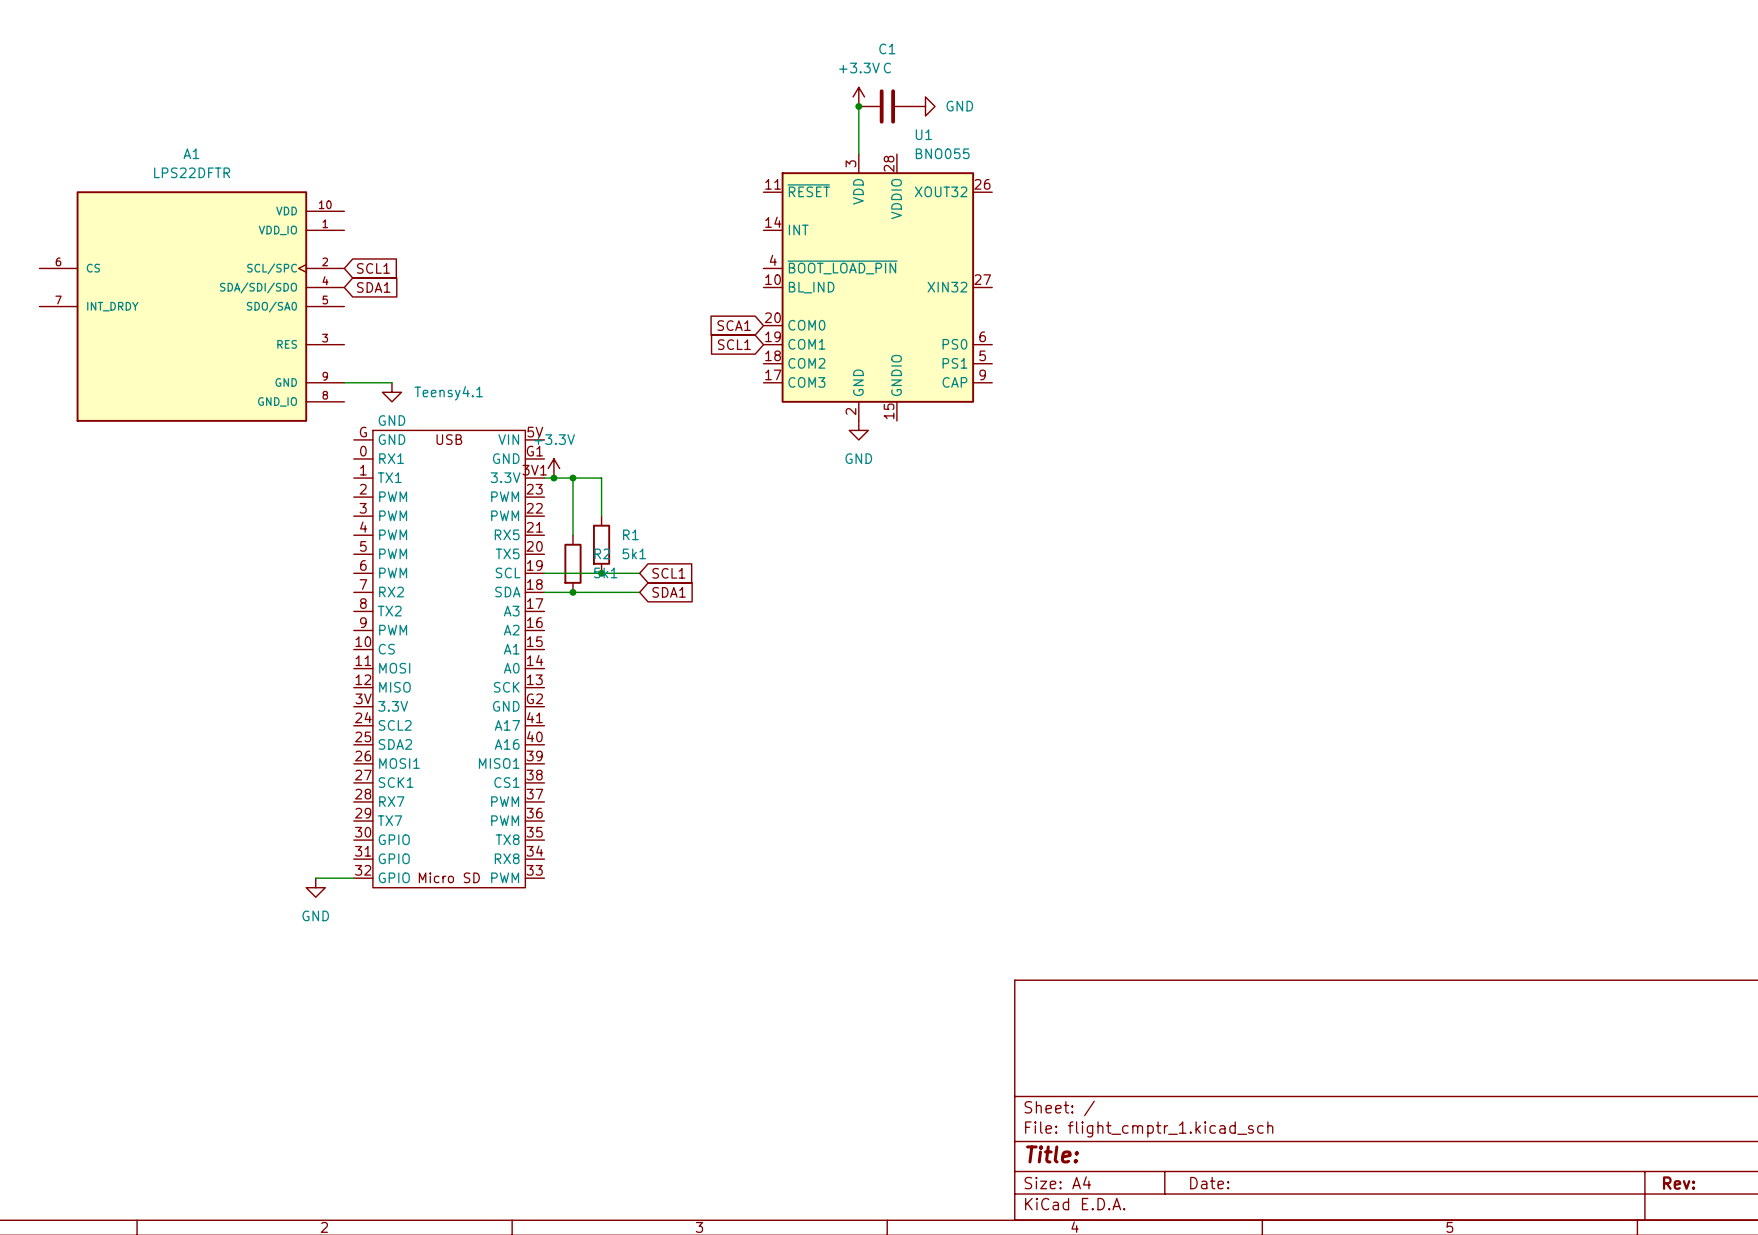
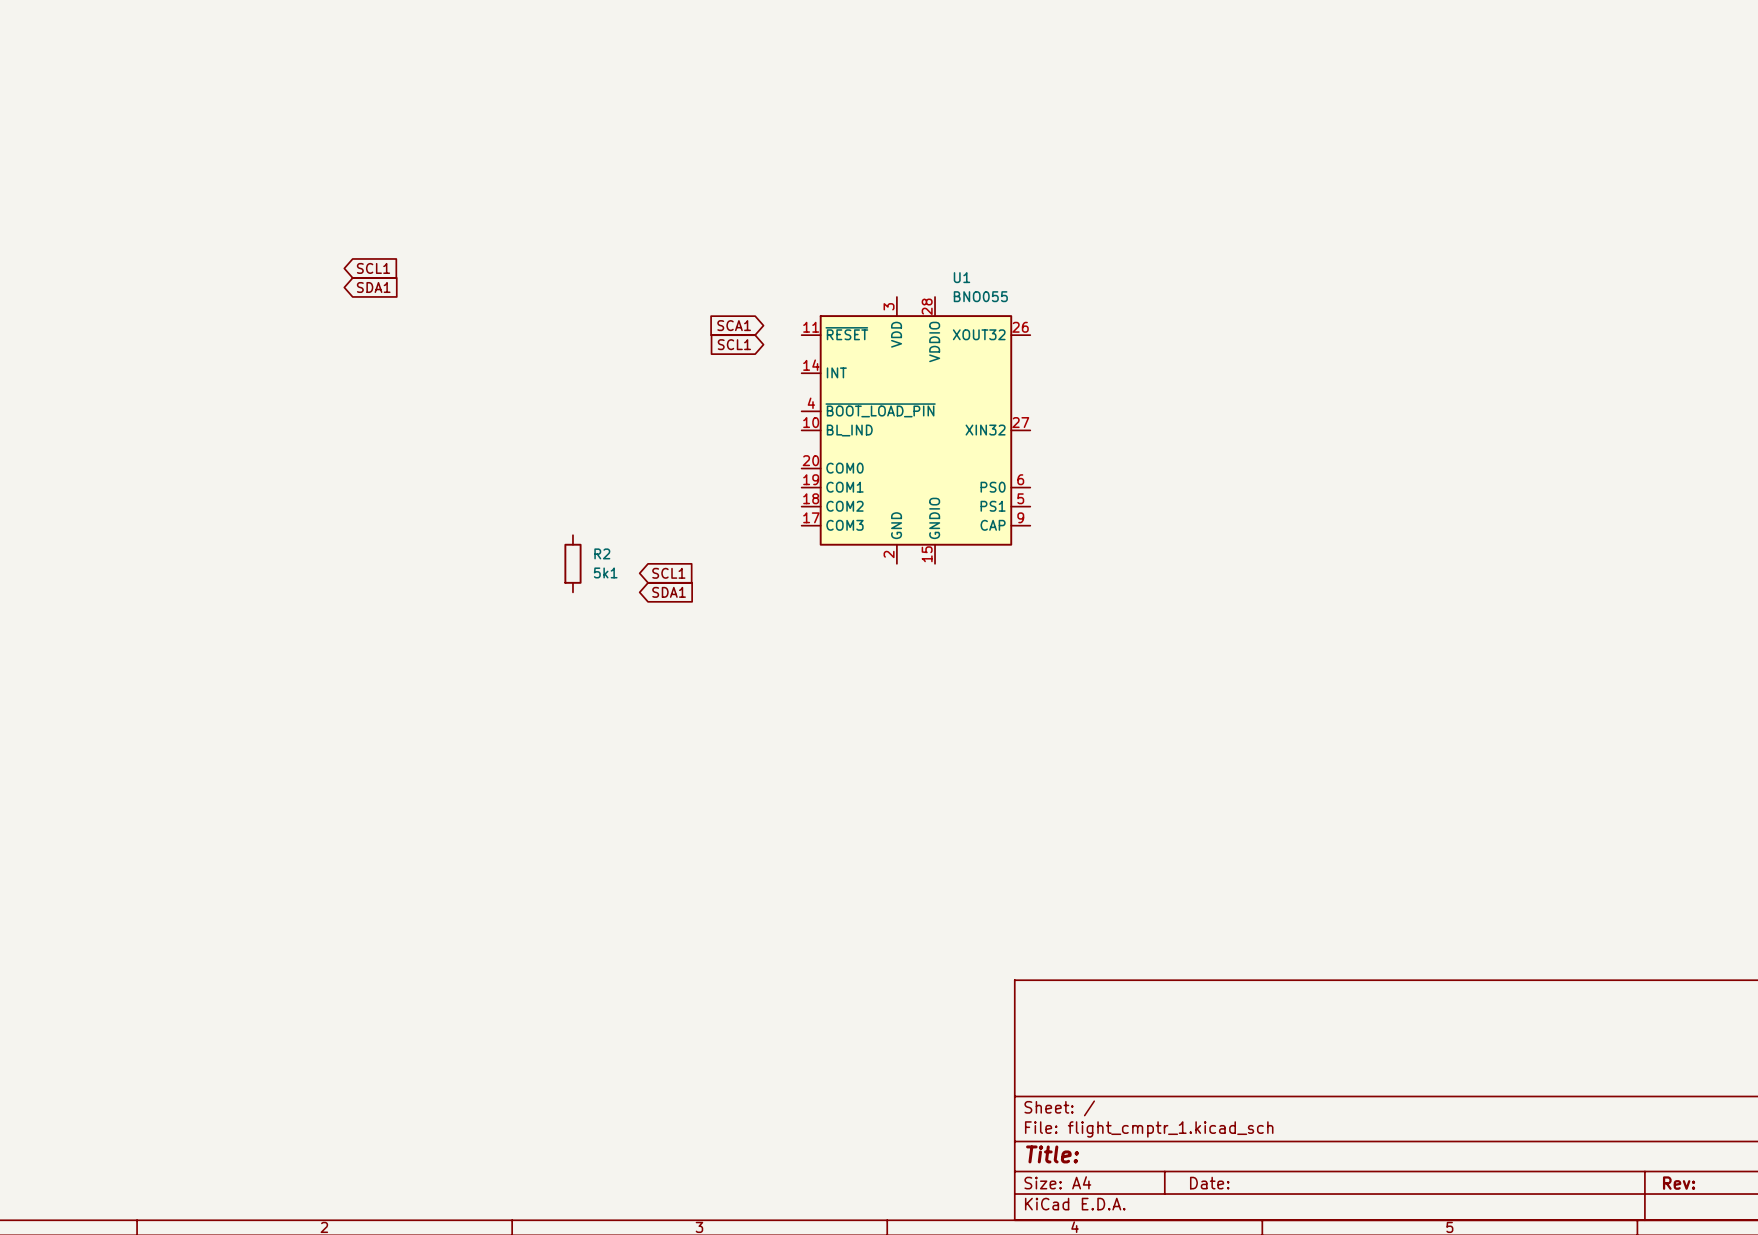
power symbol: +3.3V (858, 96) -> none
wire: (858, 106) (858, 154) -> none
junction: (858, 106) -> none
C1: C (887, 106) -> none
power symbol: GND (925, 106) -> none
U1 position: (877, 287) -> (915, 430)
A1: LPS22DFTR (191, 306) -> none
wire: (344, 382) (391, 382) -> none
power symbol: GND (391, 392) -> none
power symbol: GND (858, 430) -> none
power symbol: +3.3V (553, 468) -> none
wire: (544, 478) (601, 478) (601, 516) -> none
junction: (553, 478) -> none
wire: (572, 478) (572, 535) -> none
junction: (572, 478) -> none
R1: 5k1 (601, 544) -> none
wire: (544, 573) (639, 573) -> none
junction: (601, 573) -> none
wire: (544, 592) (639, 592) -> none
junction: (572, 592) -> none
Teensy4.1: (449, 659) -> none
wire: (315, 878) (353, 878) -> none
power symbol: GND (315, 887) -> none

